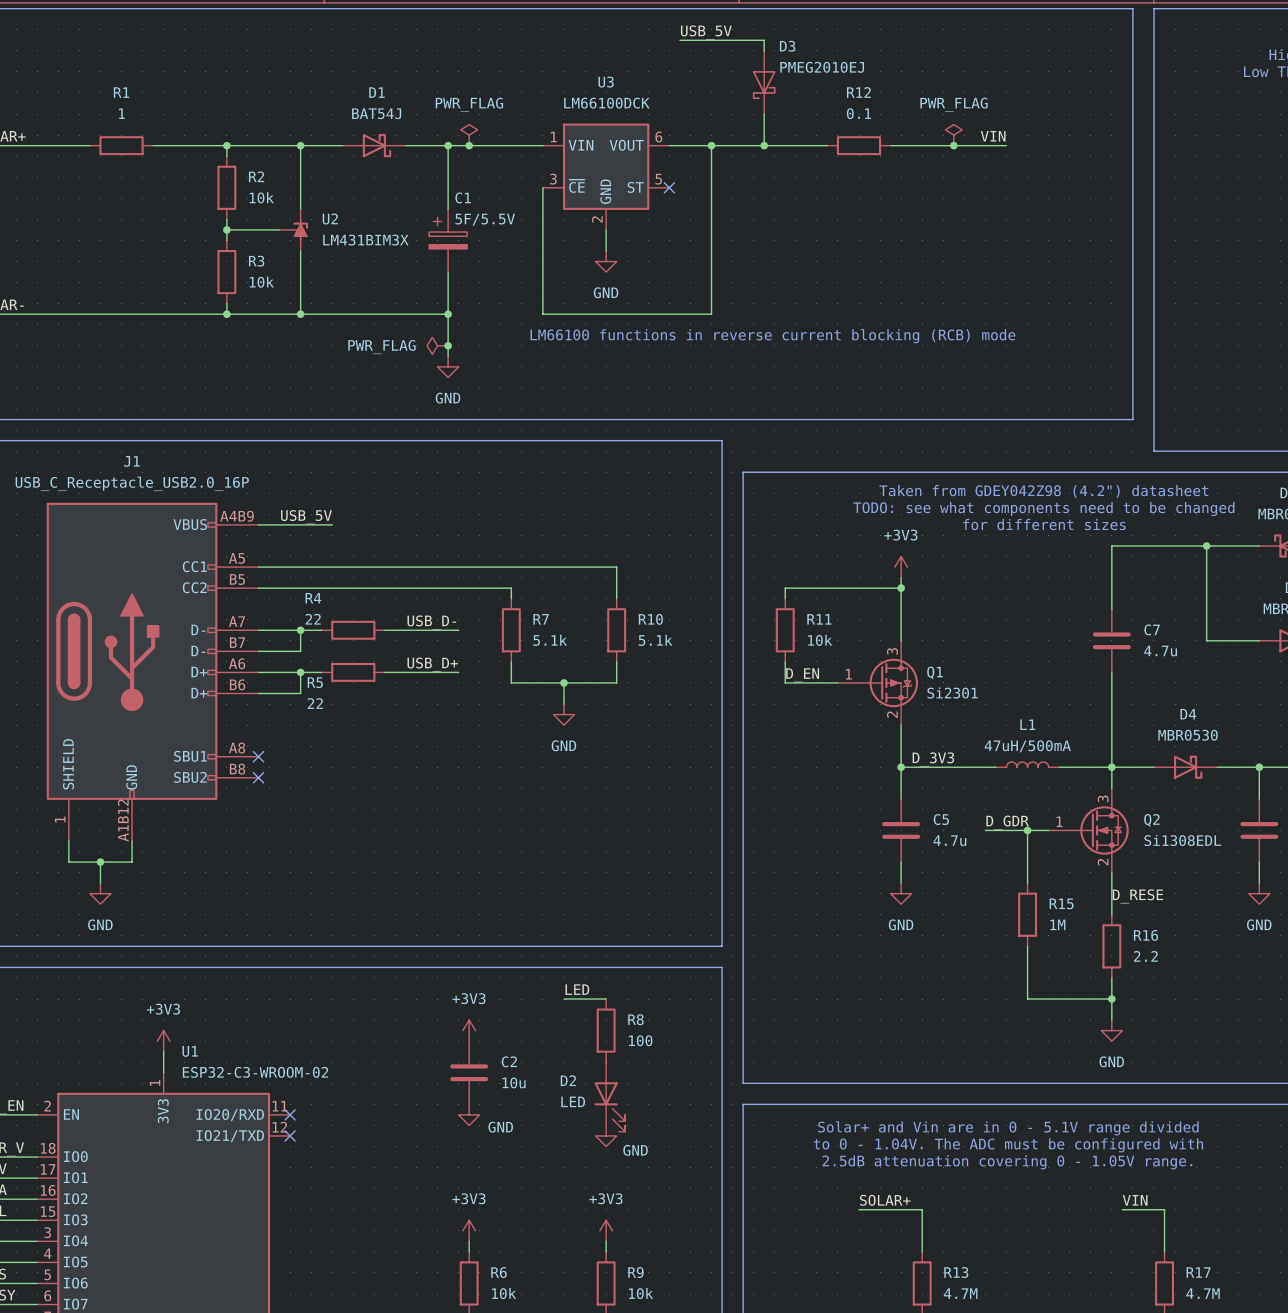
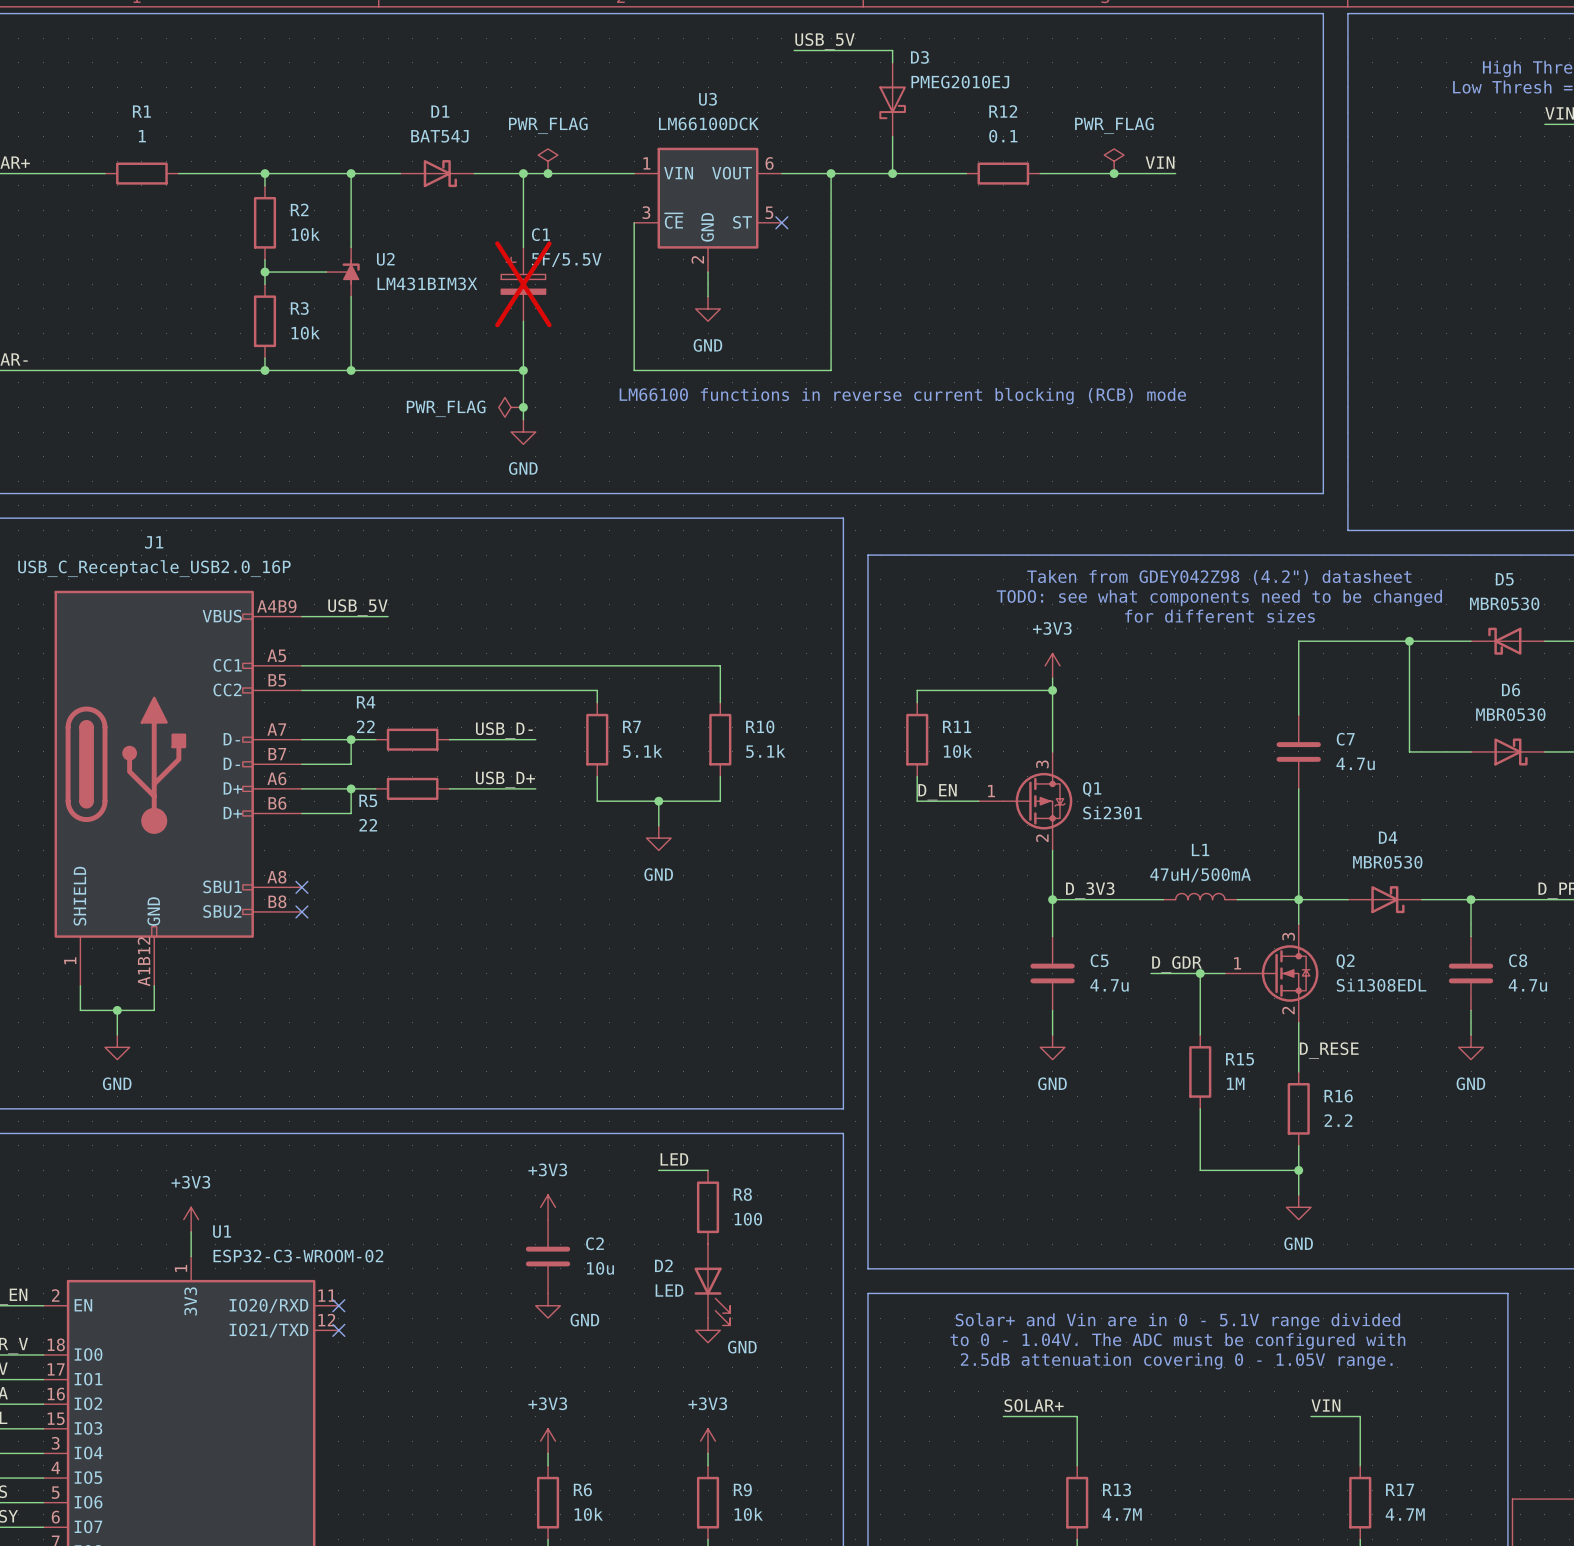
C1 do-not-place cross: none -> (523, 284)

